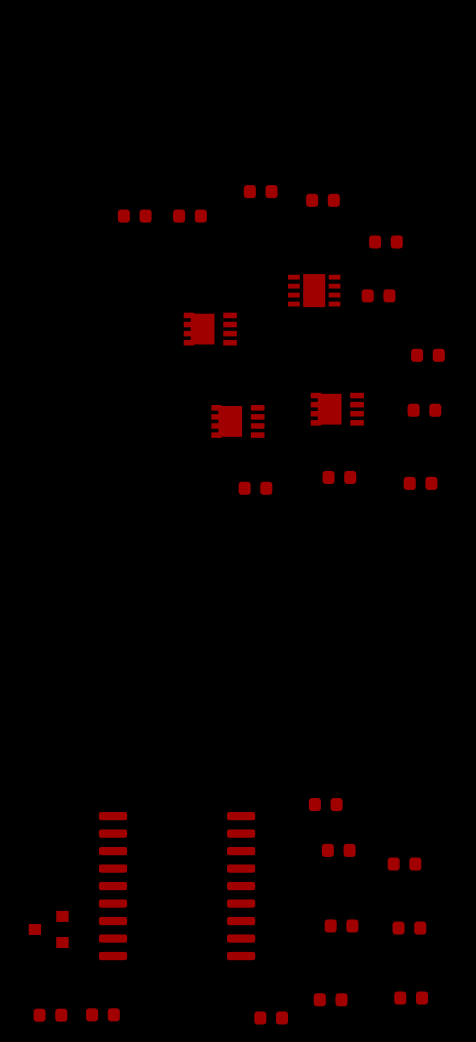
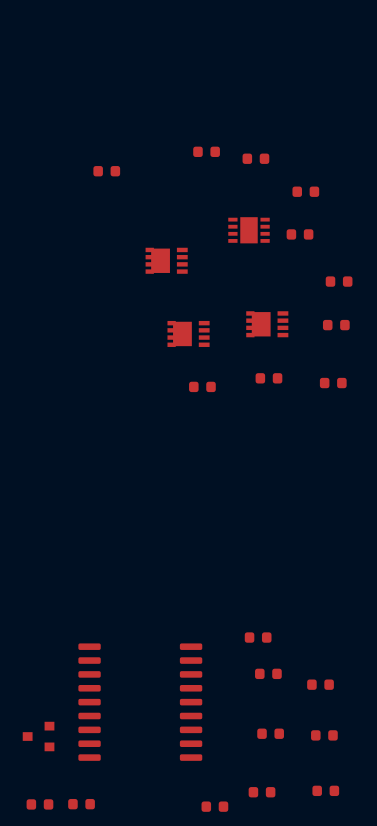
part: (189, 216) -> none

